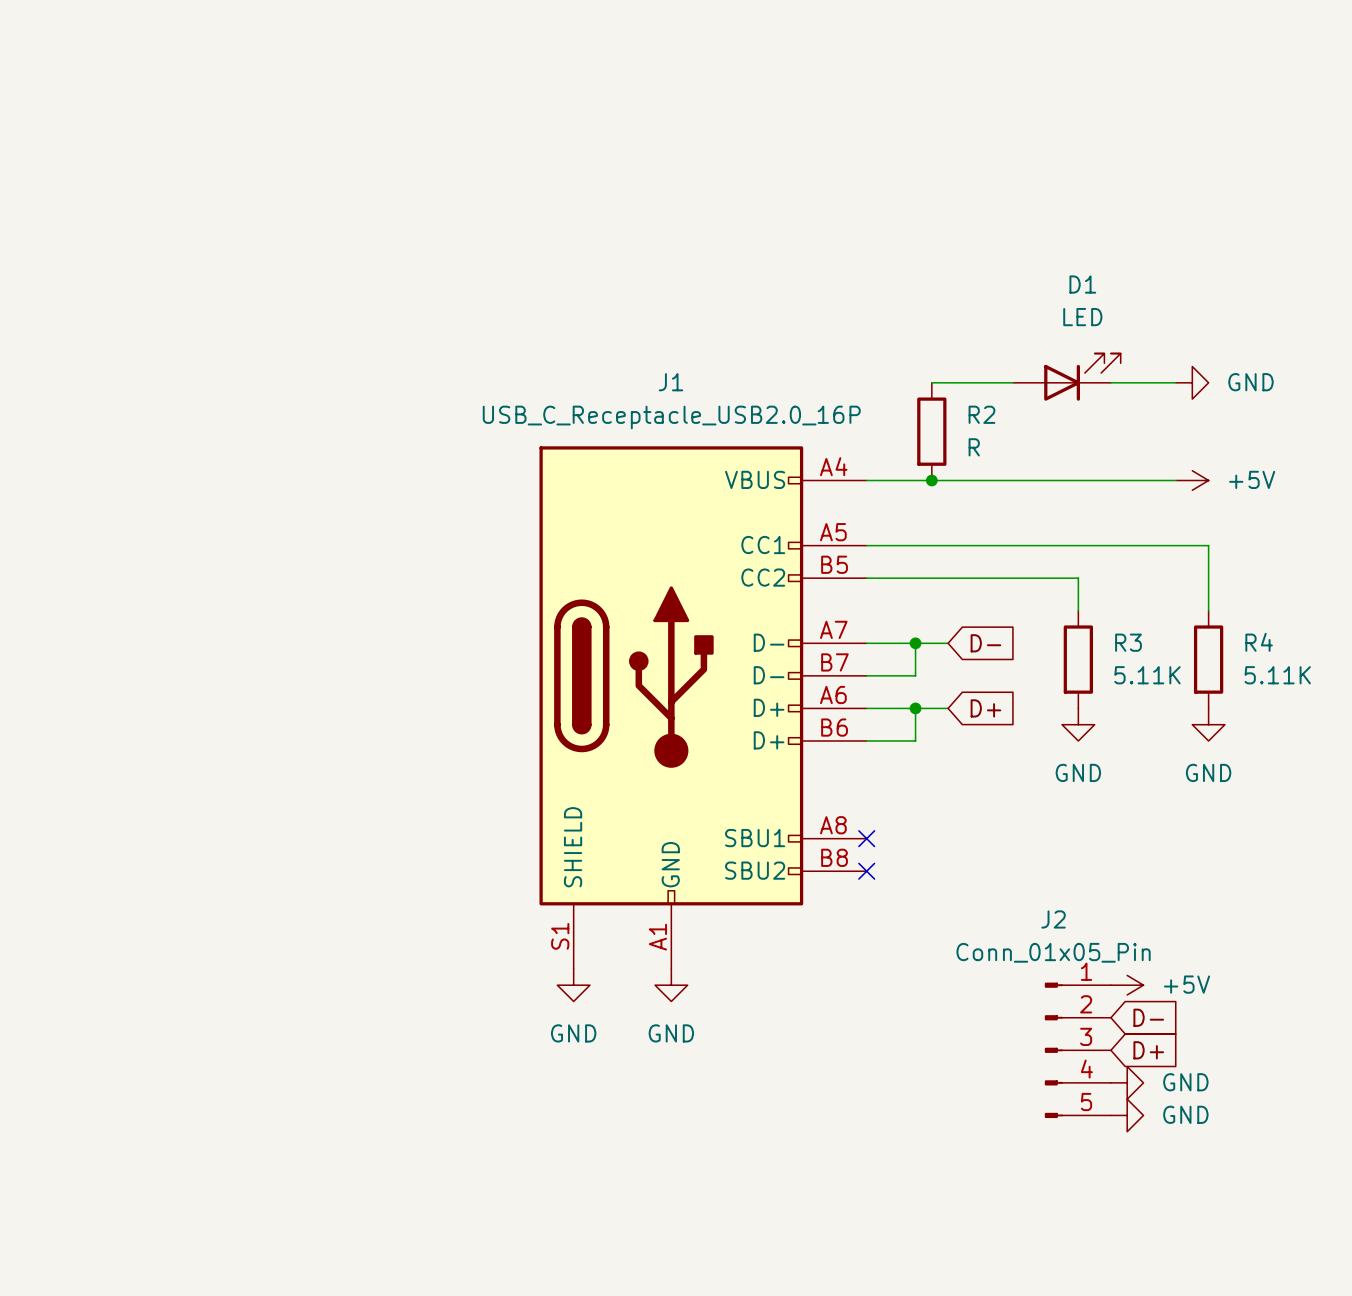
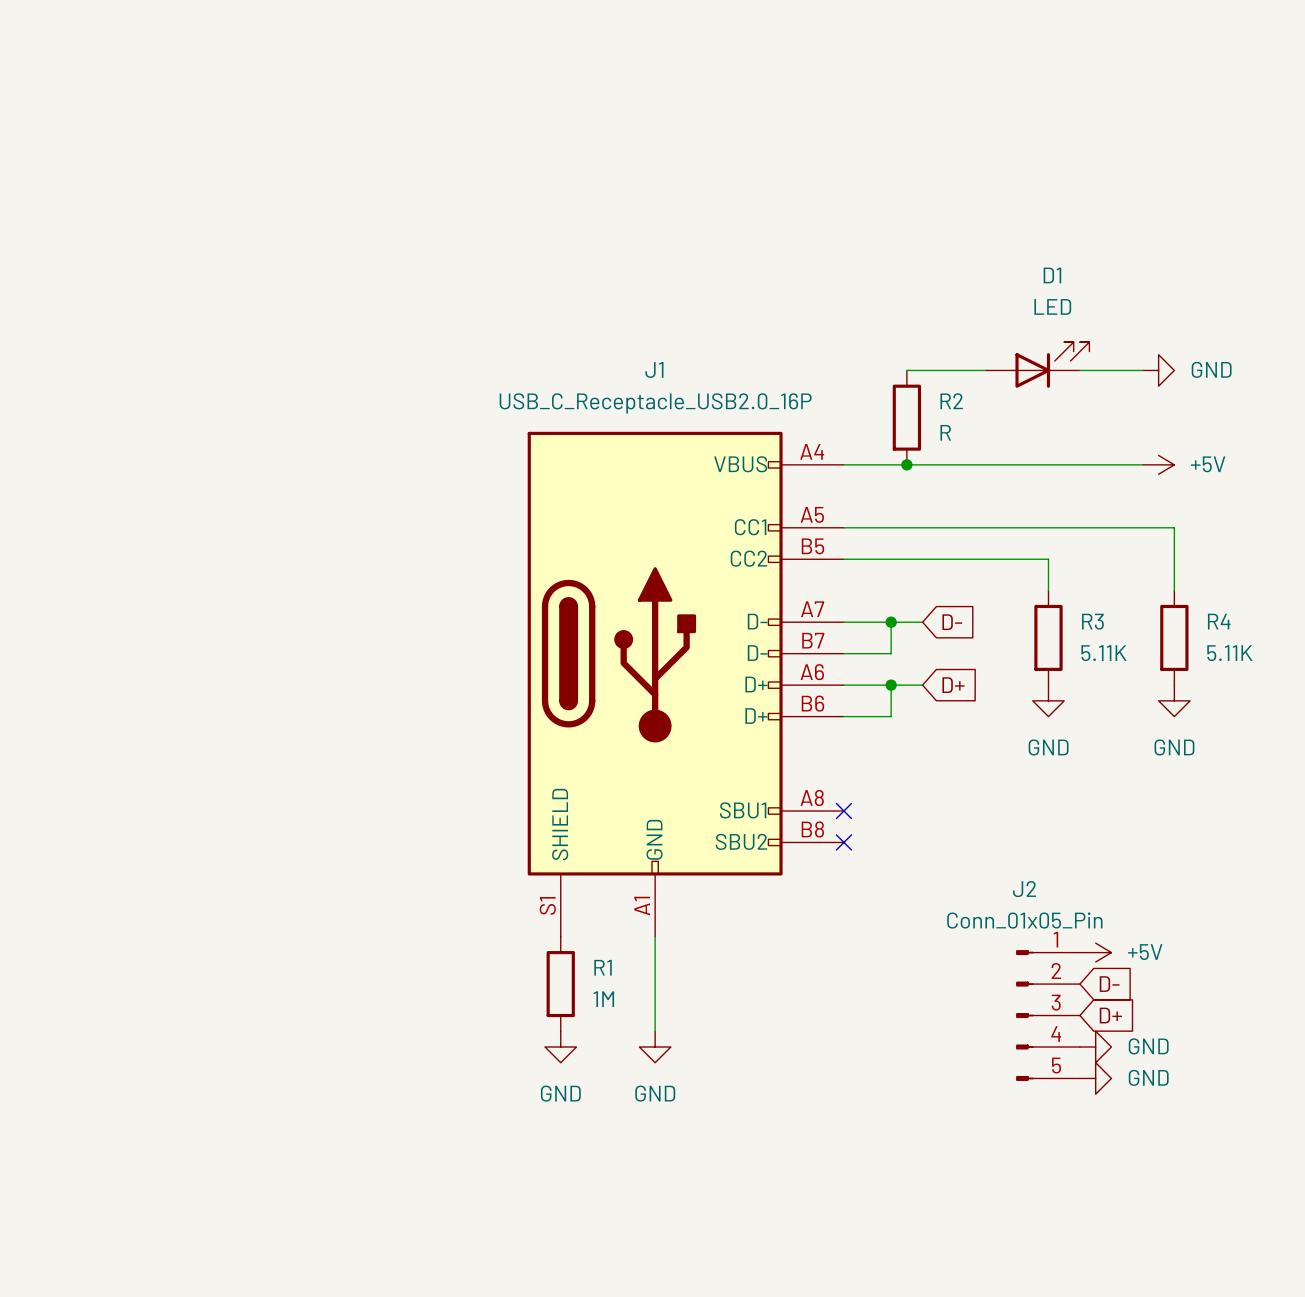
wire: none -> (655, 936) (655, 1031)
power symbol: GND (573, 985) -> none
power symbol: GND (671, 985) -> none
R1: none -> 1M (560, 984)
power symbol: none -> GND (560, 1047)
power symbol: none -> GND (655, 1047)

